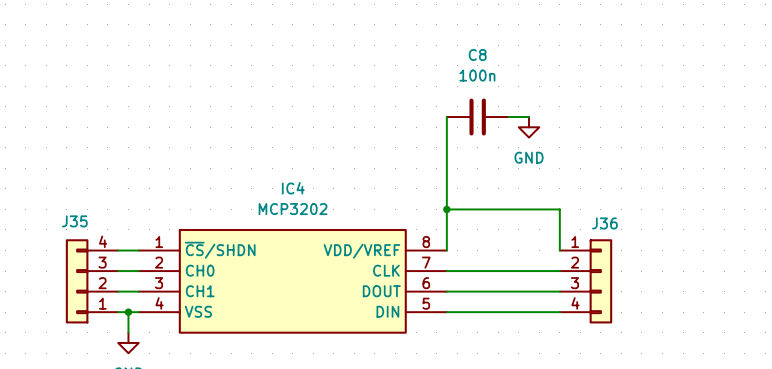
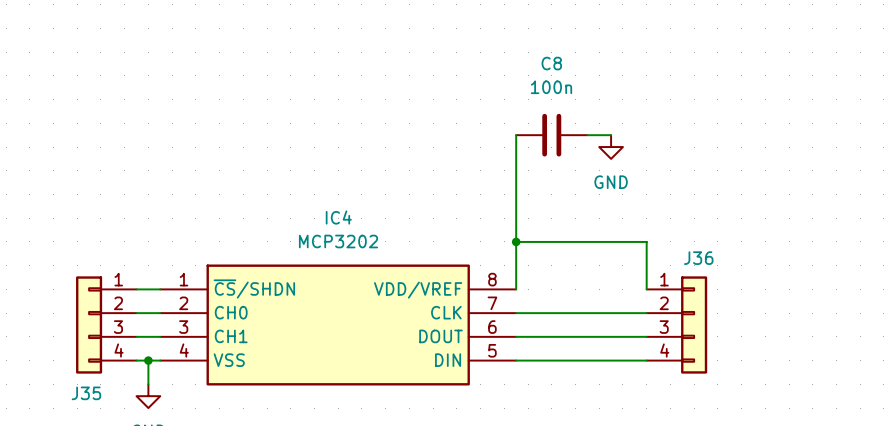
J35 flip: as is (77, 281) -> up-down (89, 324)

